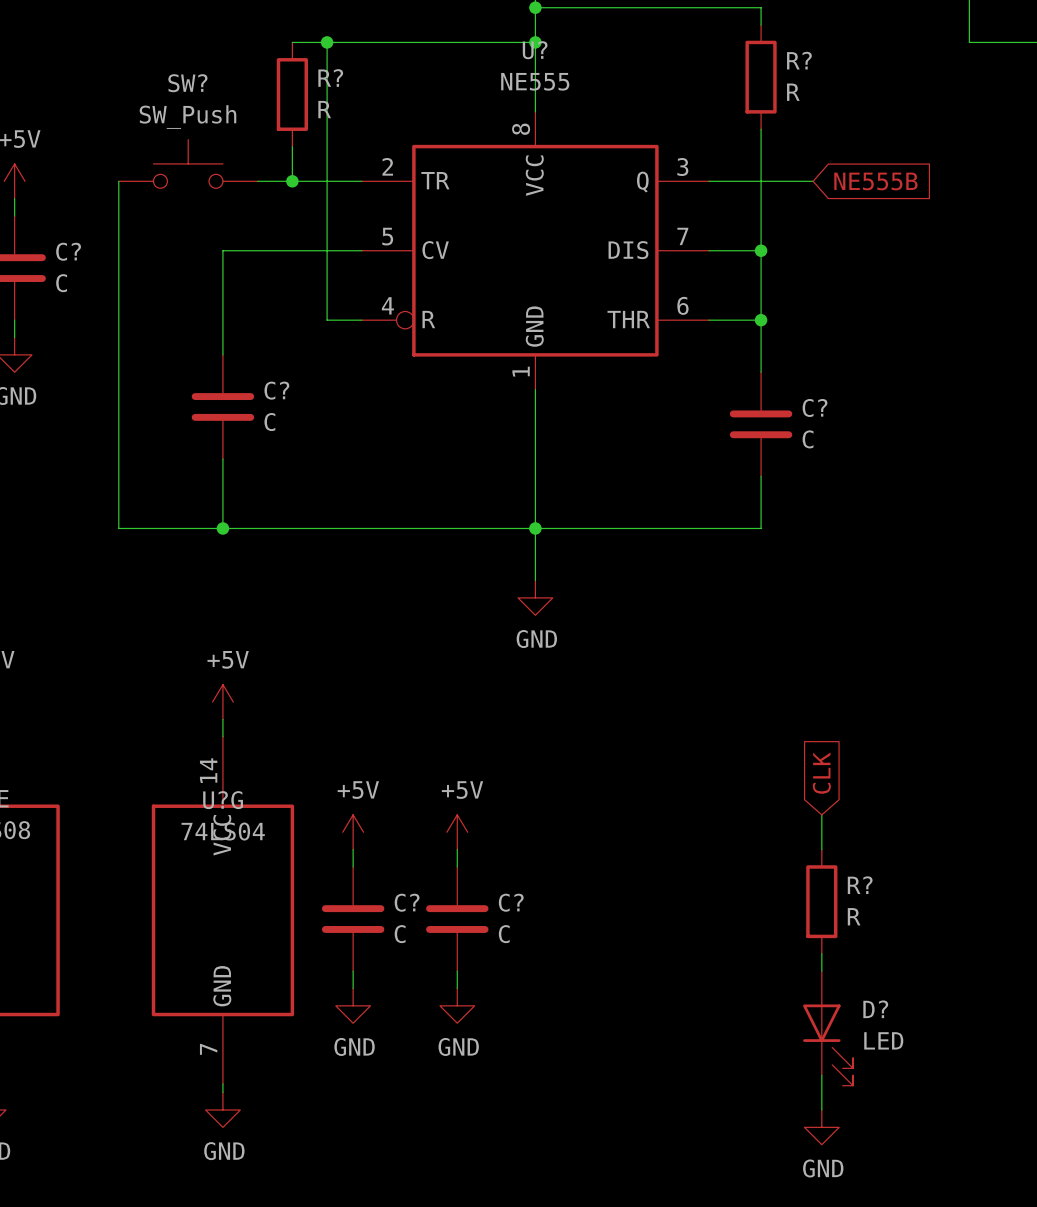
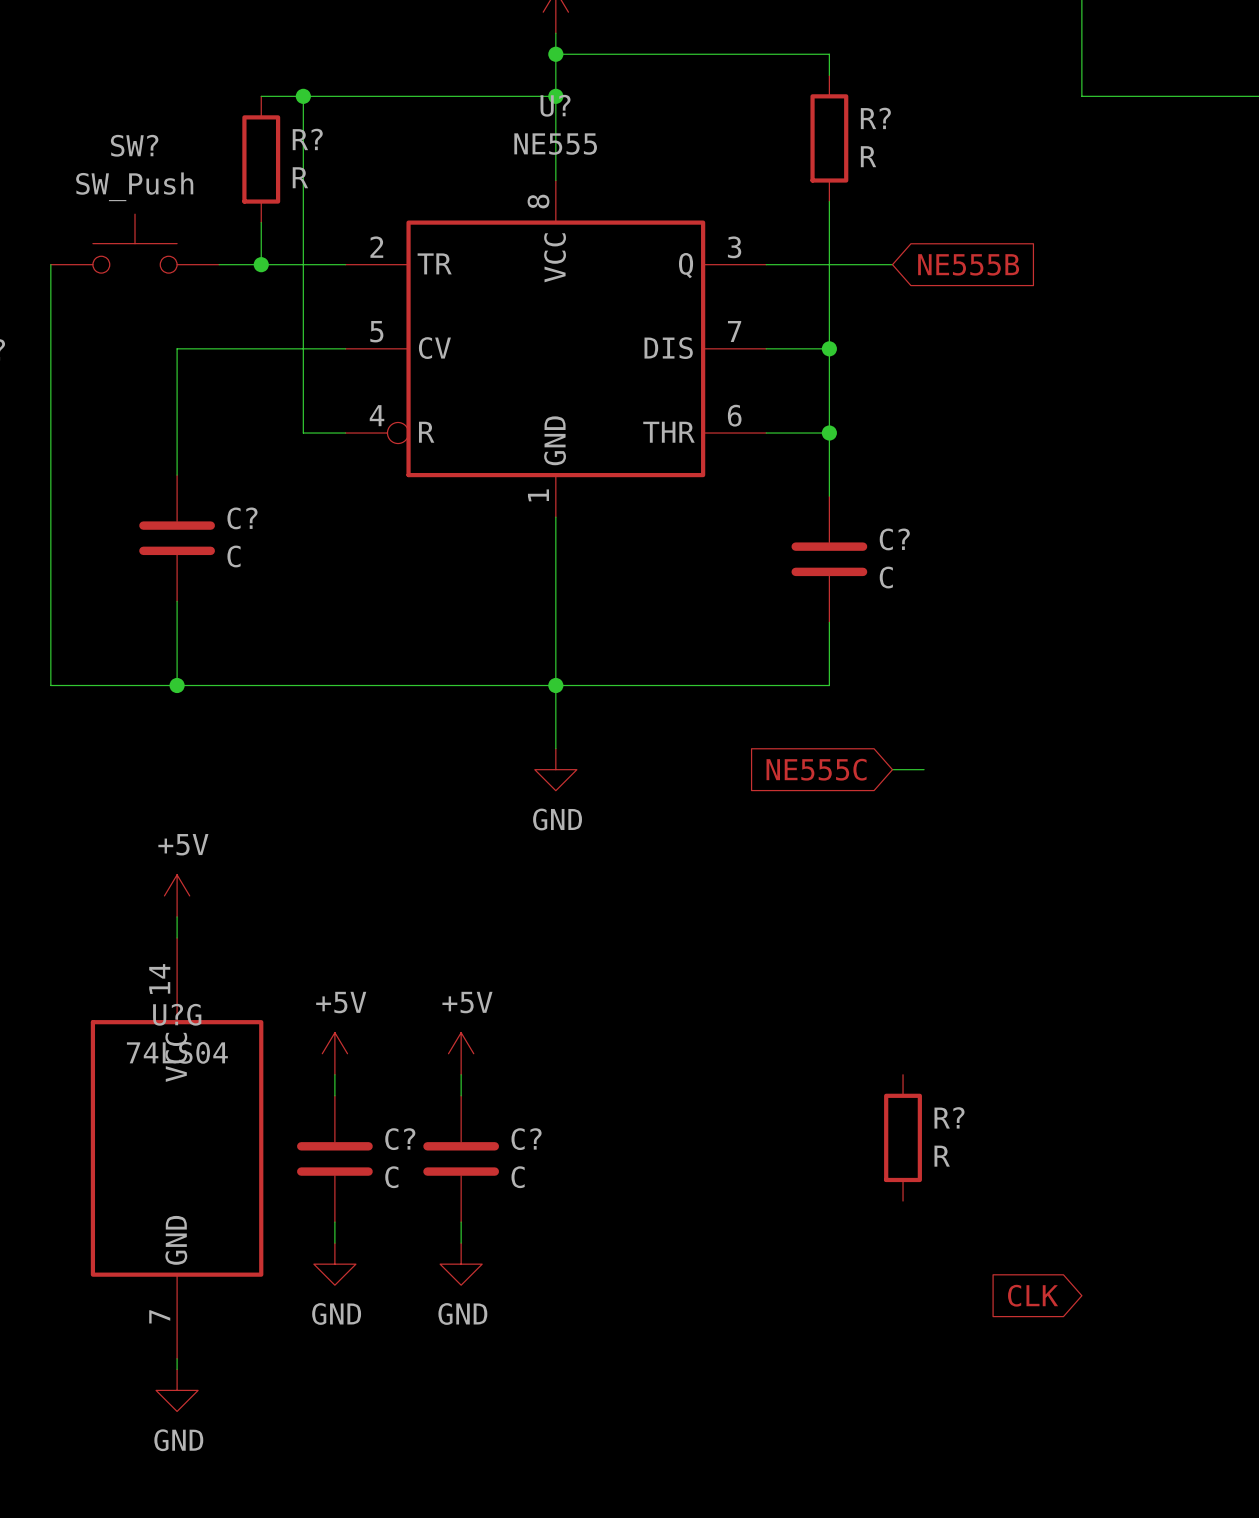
global label: none -> NE555C (816, 769)
wire: none -> (892, 769) (924, 769)
global label rotation: 0° (821, 773) -> 90° counterclockwise (1033, 1295)
global label position: CLK (821, 773) -> CLK (1033, 1295)
wire: (821, 814) (821, 849) -> none
wire: (821, 953) (821, 971) -> none
D?: LED (828, 1028) -> none
wire: (821, 1075) (821, 1110) -> none
power symbol: GND (821, 1127) -> none

